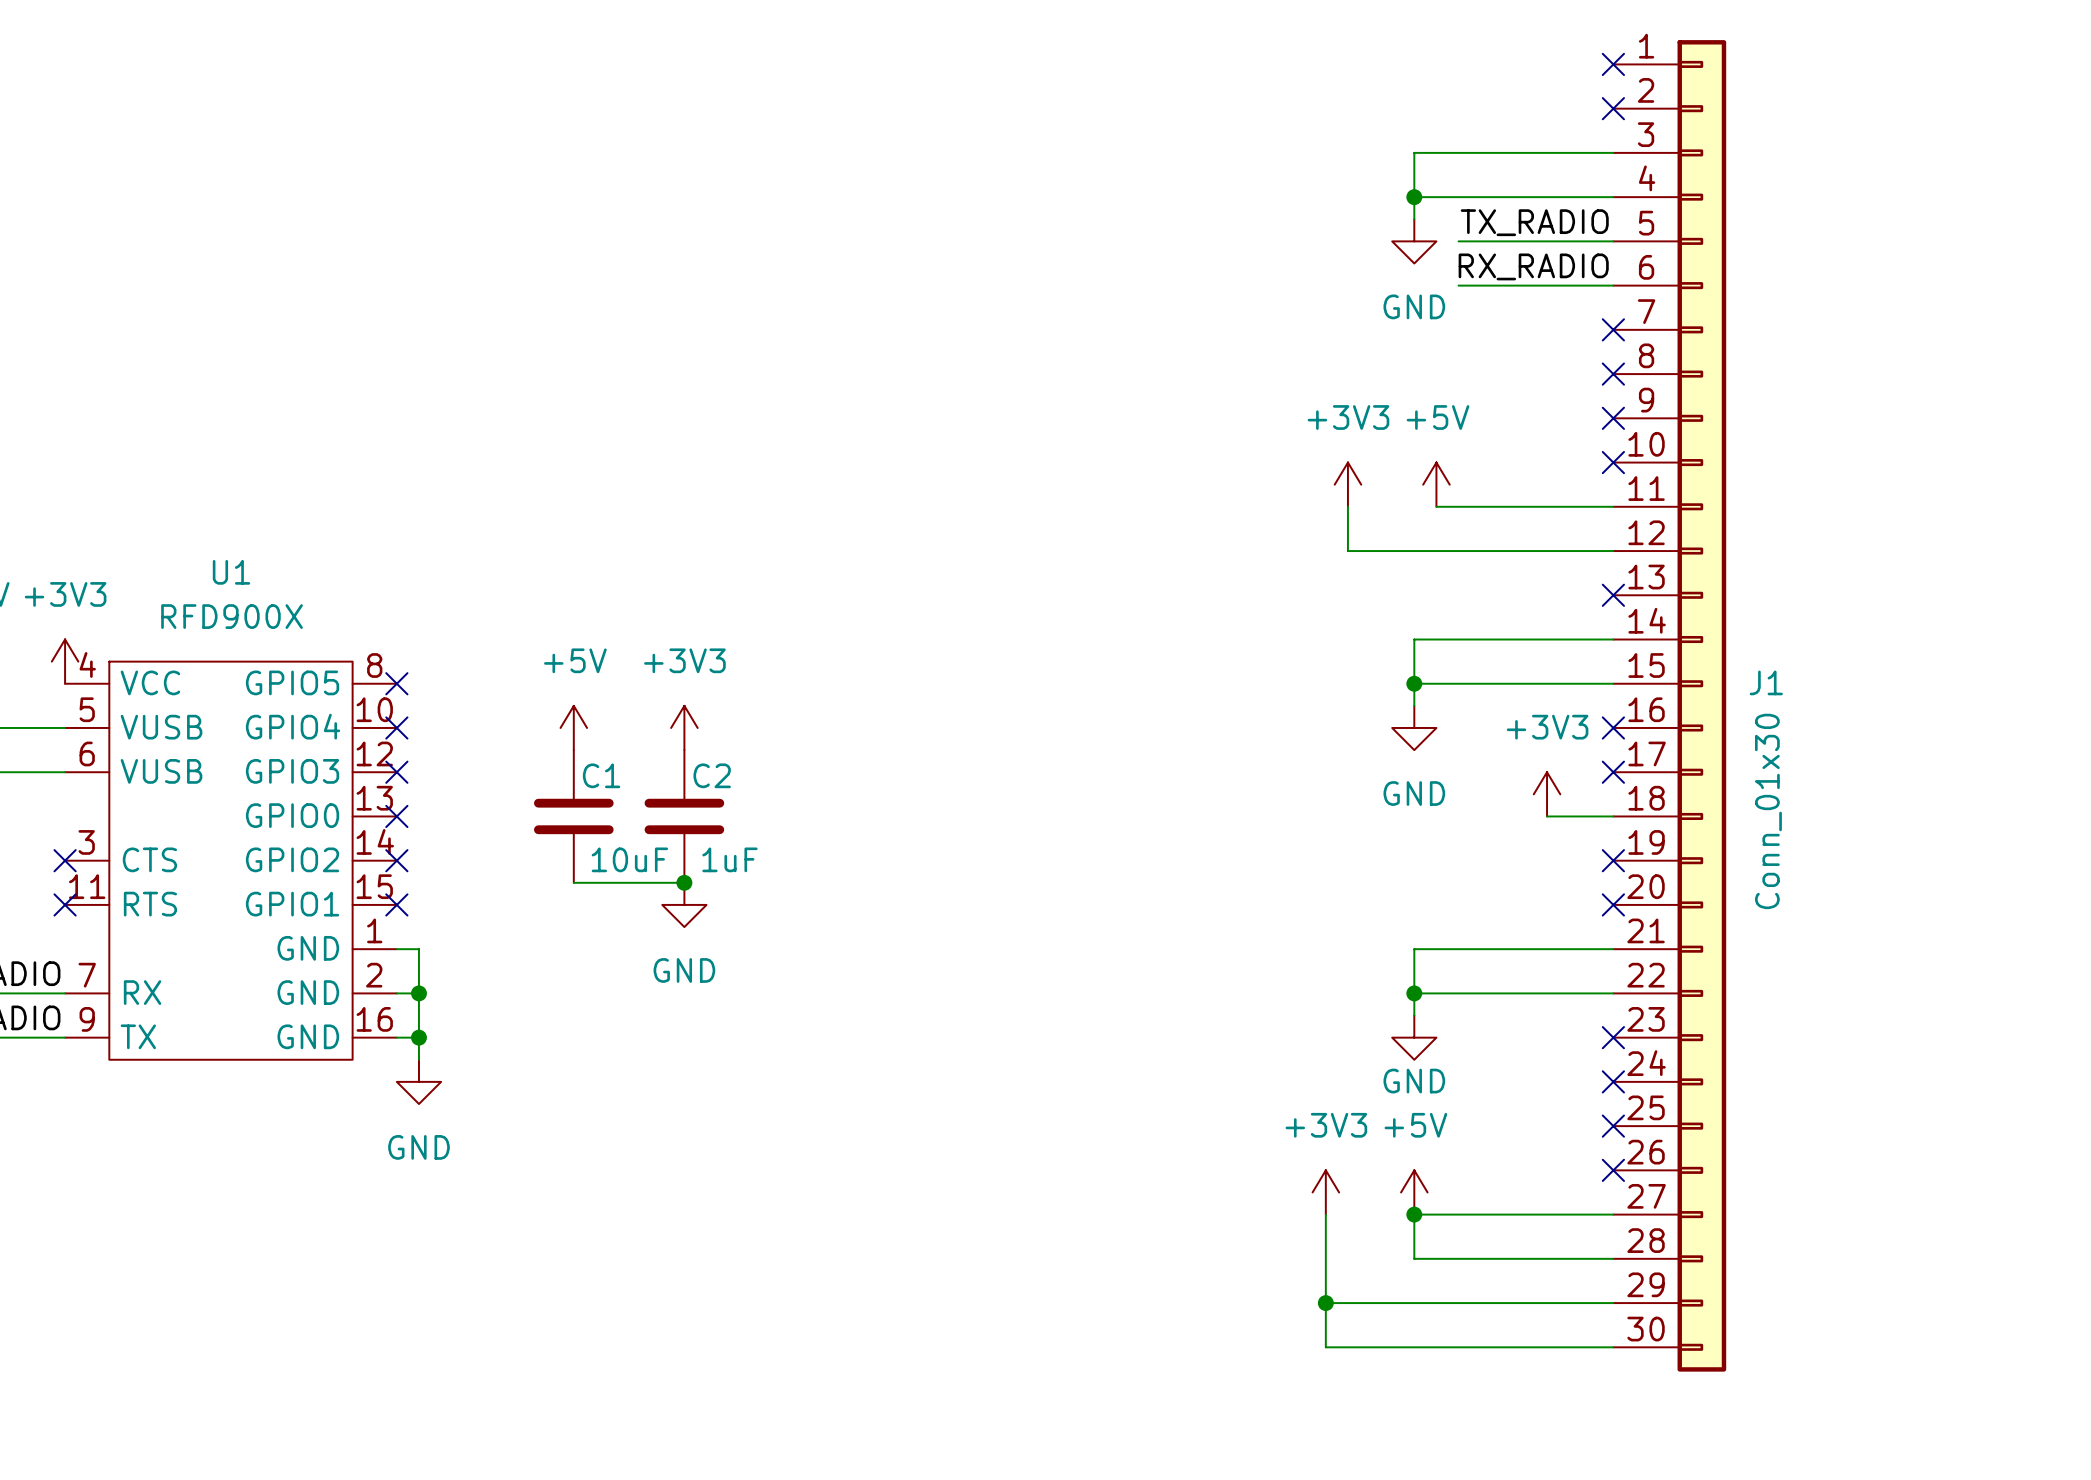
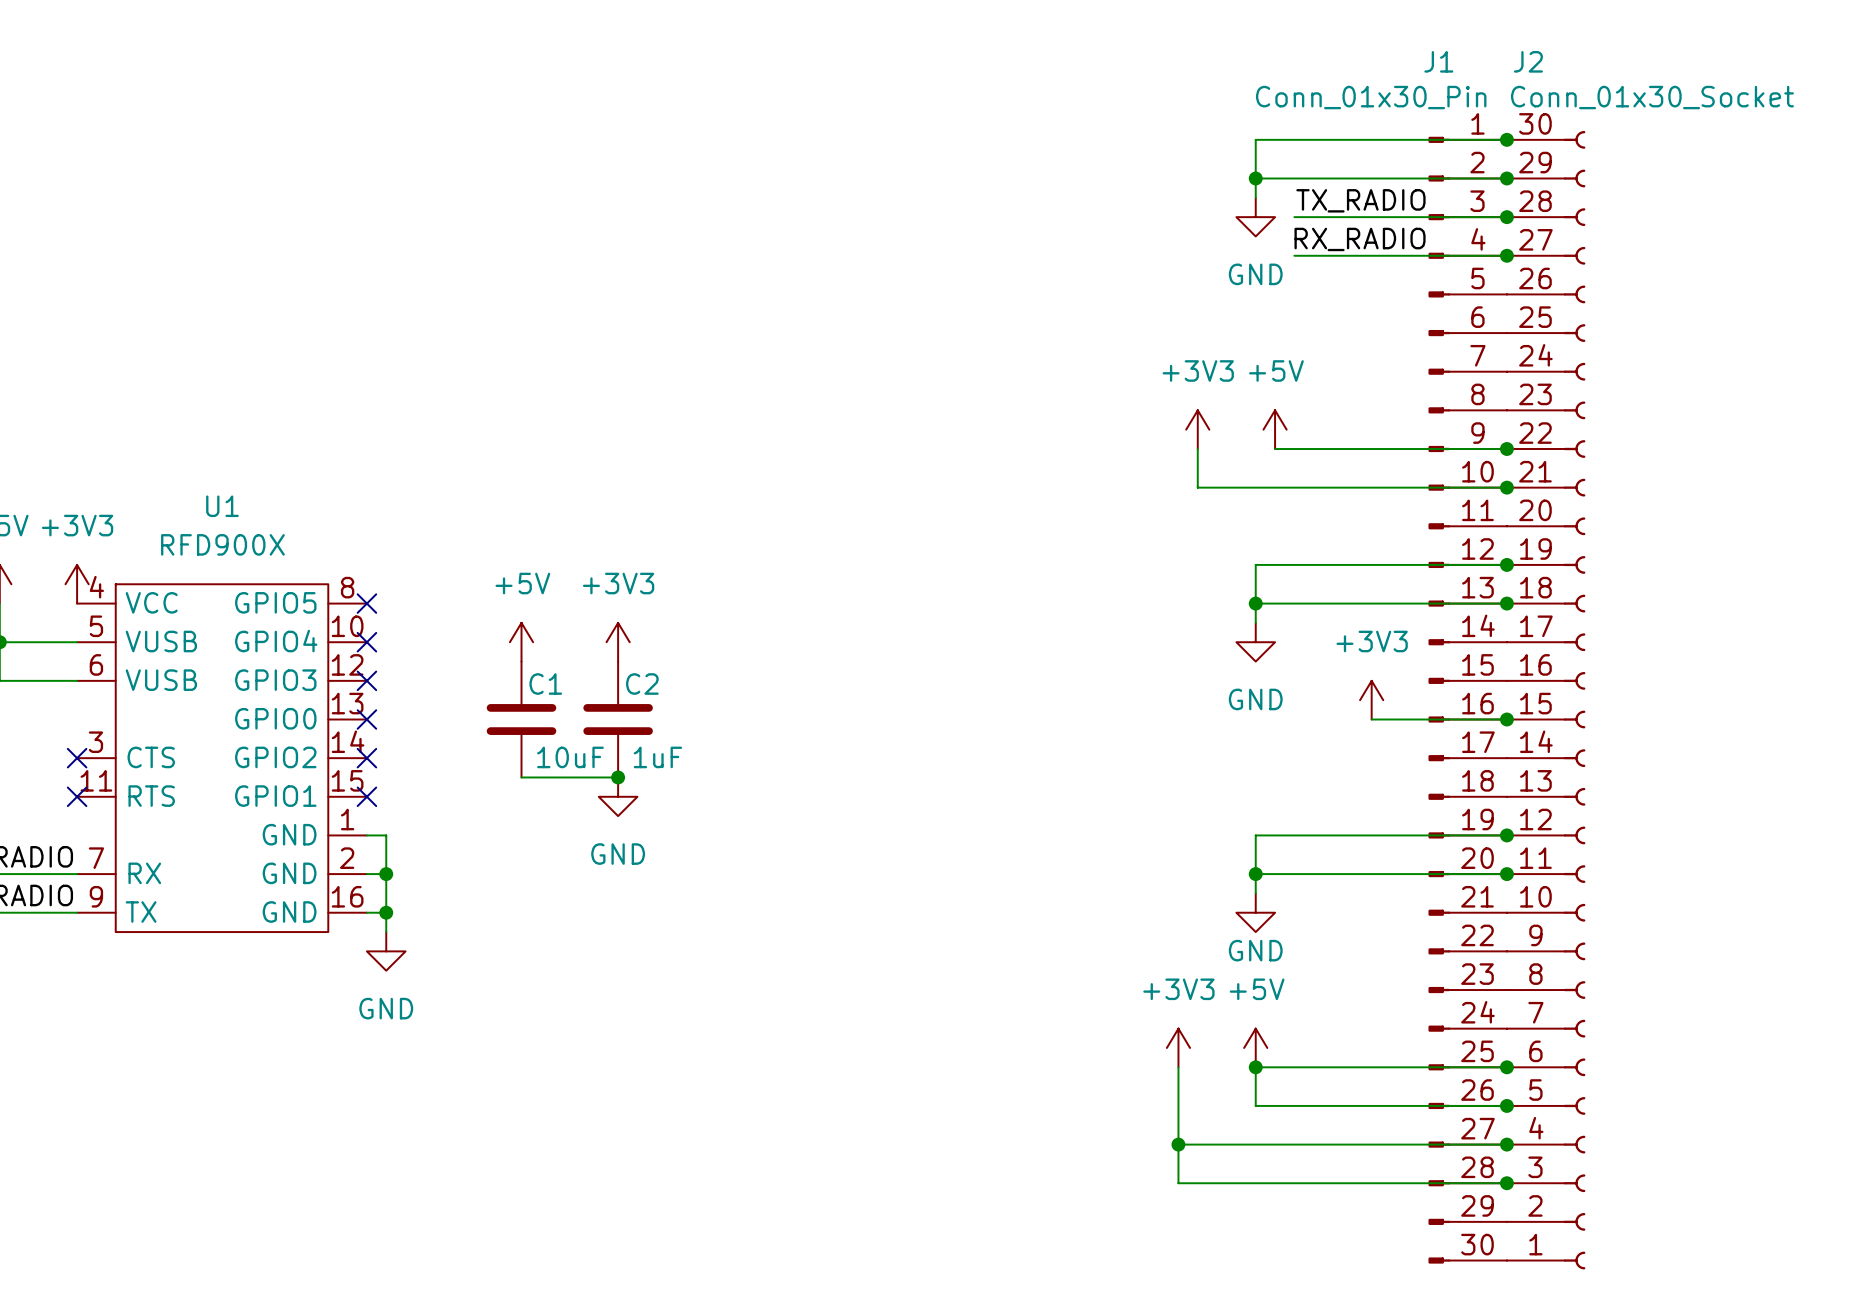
J1 symbol: [1613, 40, 1727, 1372] -> [1428, 136, 1507, 1264]
no-connect mark: (1613, 64) -> none
no-connect mark: (1613, 108) -> none
junction: none -> (1506, 139)
junction: none -> (1506, 178)
junction: none -> (1506, 217)
junction: none -> (1506, 255)
no-connect mark: (1613, 329) -> none
no-connect mark: (1613, 374) -> none
no-connect mark: (1613, 418) -> none
no-connect mark: (1613, 462) -> none
junction: none -> (1506, 449)
junction: none -> (1506, 487)
no-connect mark: (1613, 595) -> none
junction: none -> (1506, 564)
J1 name position: J1 (1766, 682) -> J1 (1438, 61)
junction: none -> (1506, 603)
no-connect mark: (1613, 727) -> none
no-connect mark: (1613, 772) -> none
J2: none -> Conn_01x30_Socket (1546, 700)
J1 value: Conn_01x30 (1768, 811) -> Conn_01x30_Pin (1371, 97)
junction: none -> (1506, 719)
no-connect mark: (1613, 860) -> none
no-connect mark: (1613, 904) -> none
junction: none -> (1506, 835)
junction: none -> (1506, 874)
no-connect mark: (1613, 1037) -> none
no-connect mark: (1613, 1081) -> none
no-connect mark: (1613, 1126) -> none
no-connect mark: (1613, 1170) -> none
junction: none -> (1506, 1067)
junction: none -> (1506, 1105)
junction: none -> (1506, 1144)
junction: none -> (1506, 1183)

